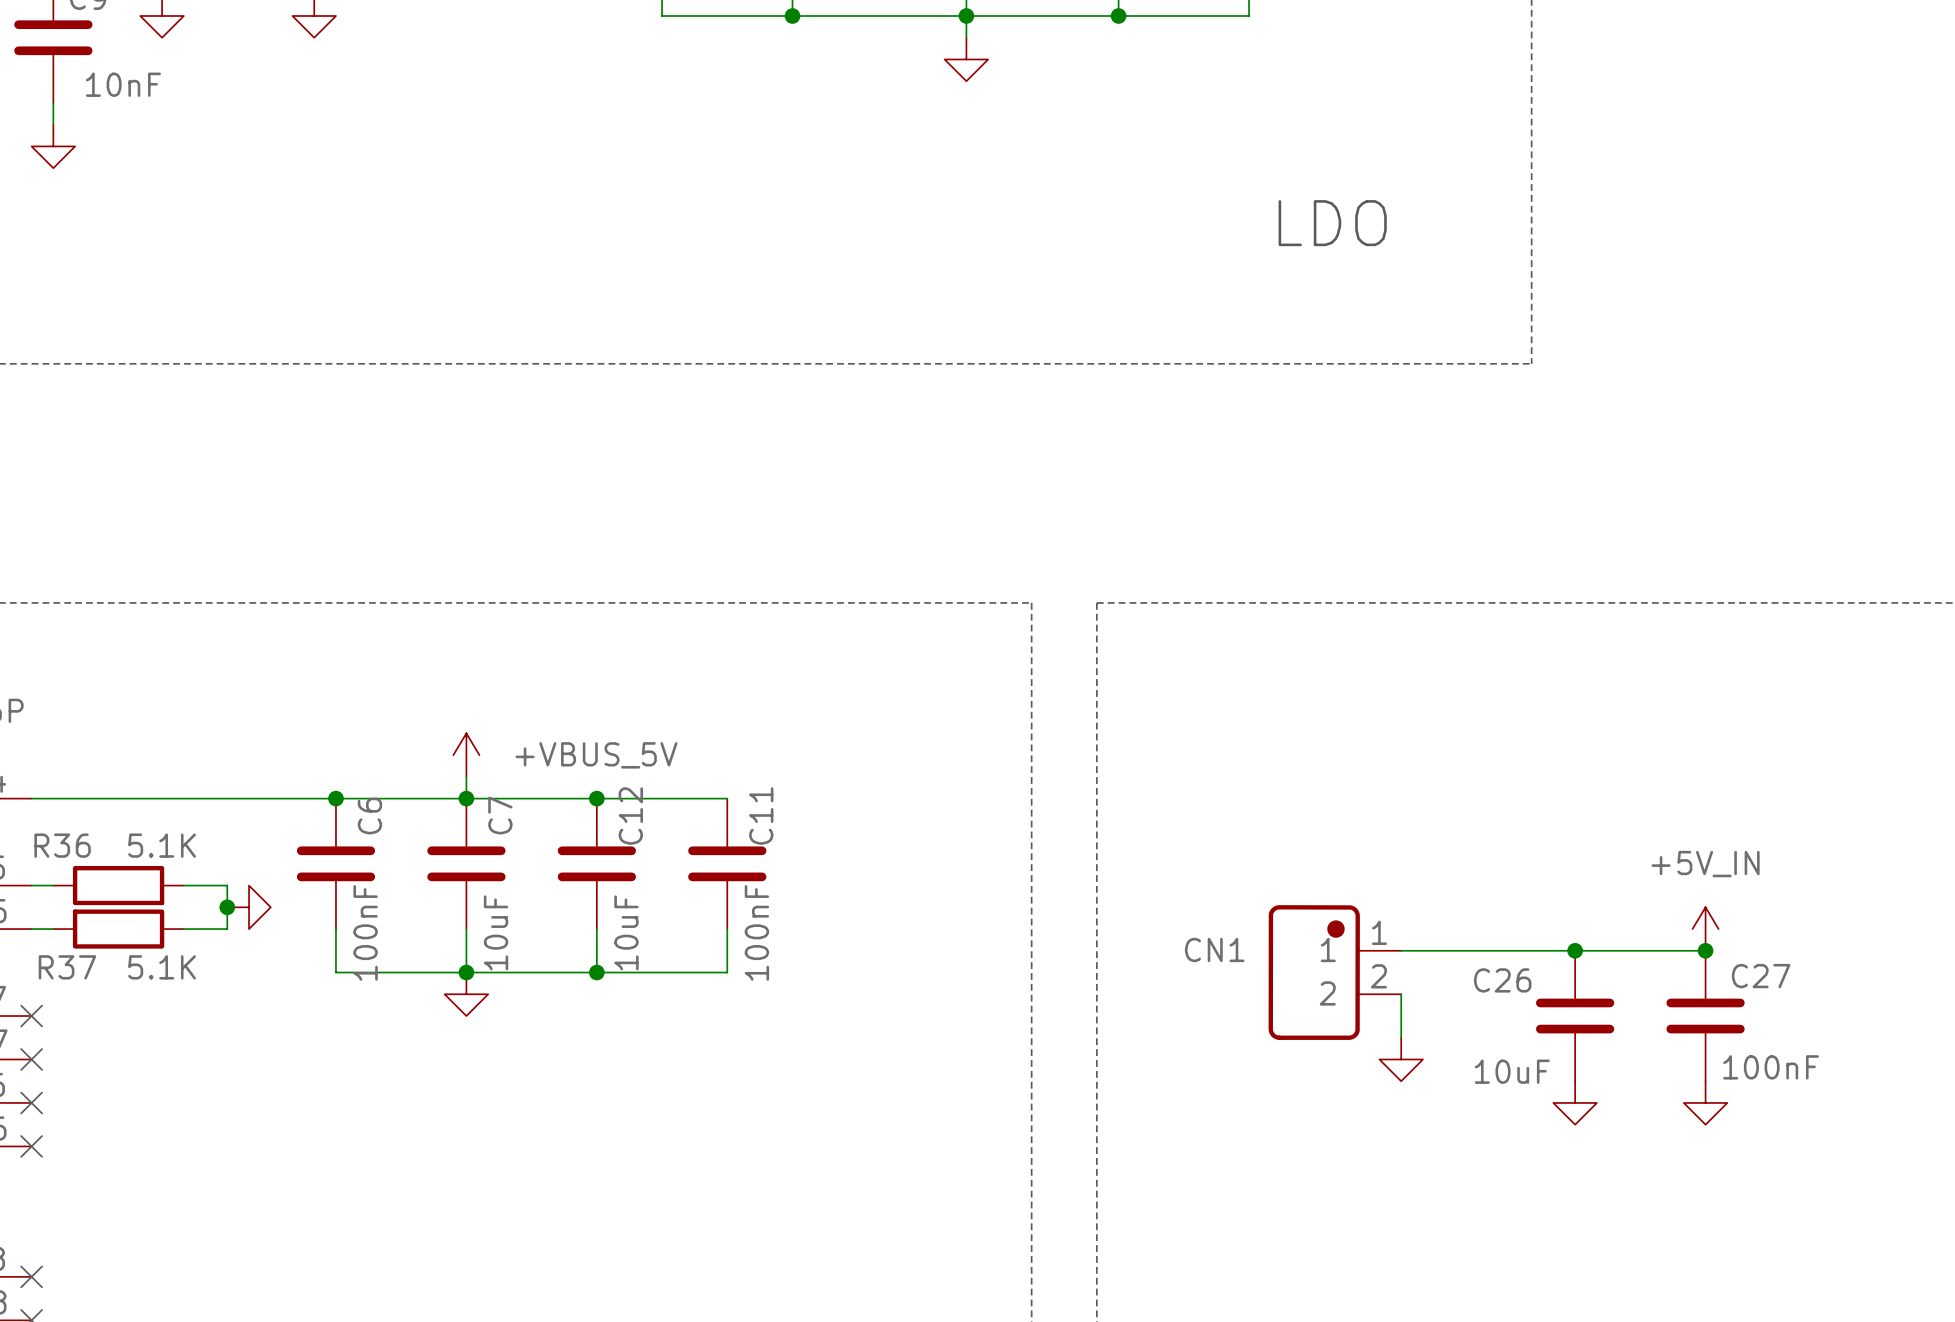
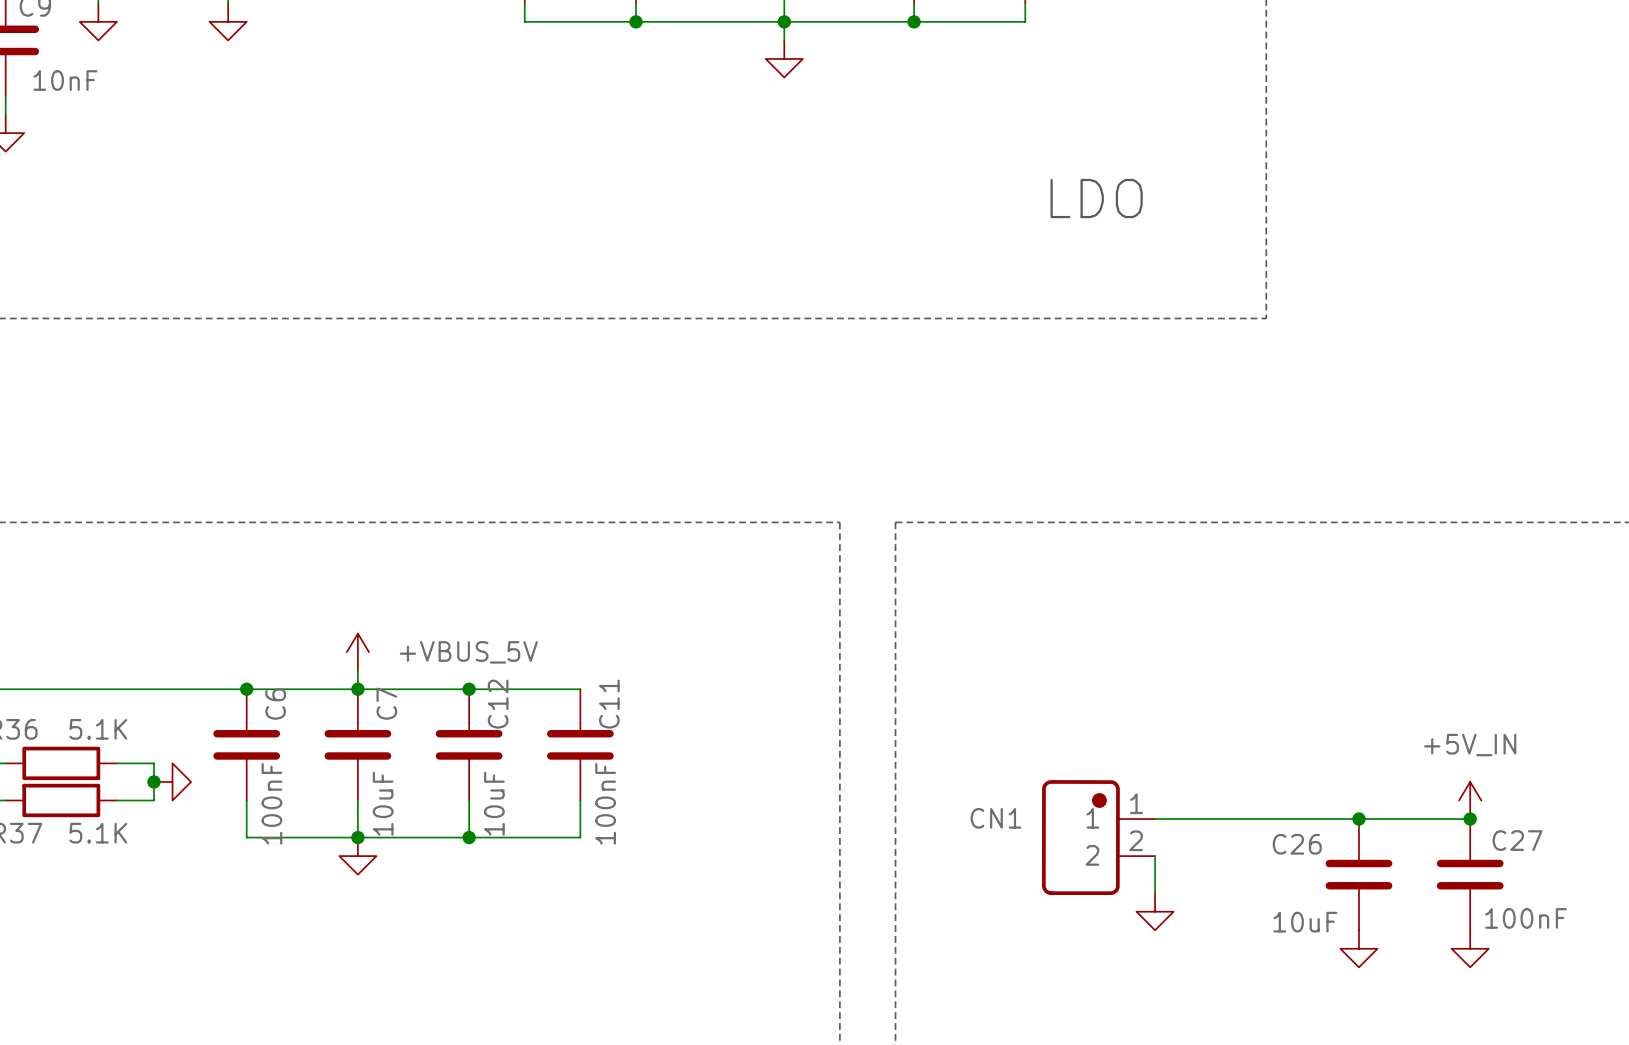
power symbol position: +5V_IN (1705, 929) -> +5V_IN (1470, 800)
junction: (1575, 950) -> none
junction: none -> (1358, 819)
wire: none -> (1414, 819) (1470, 819)
junction: (1705, 950) -> none
junction: none -> (1470, 819)
C26 position: (1575, 1016) -> (1358, 874)
C27 position: (1705, 1016) -> (1470, 874)
power symbol: (1575, 1102) -> none
power symbol: none -> (1358, 948)
power symbol: (1705, 1102) -> none
power symbol: none -> (1470, 948)

